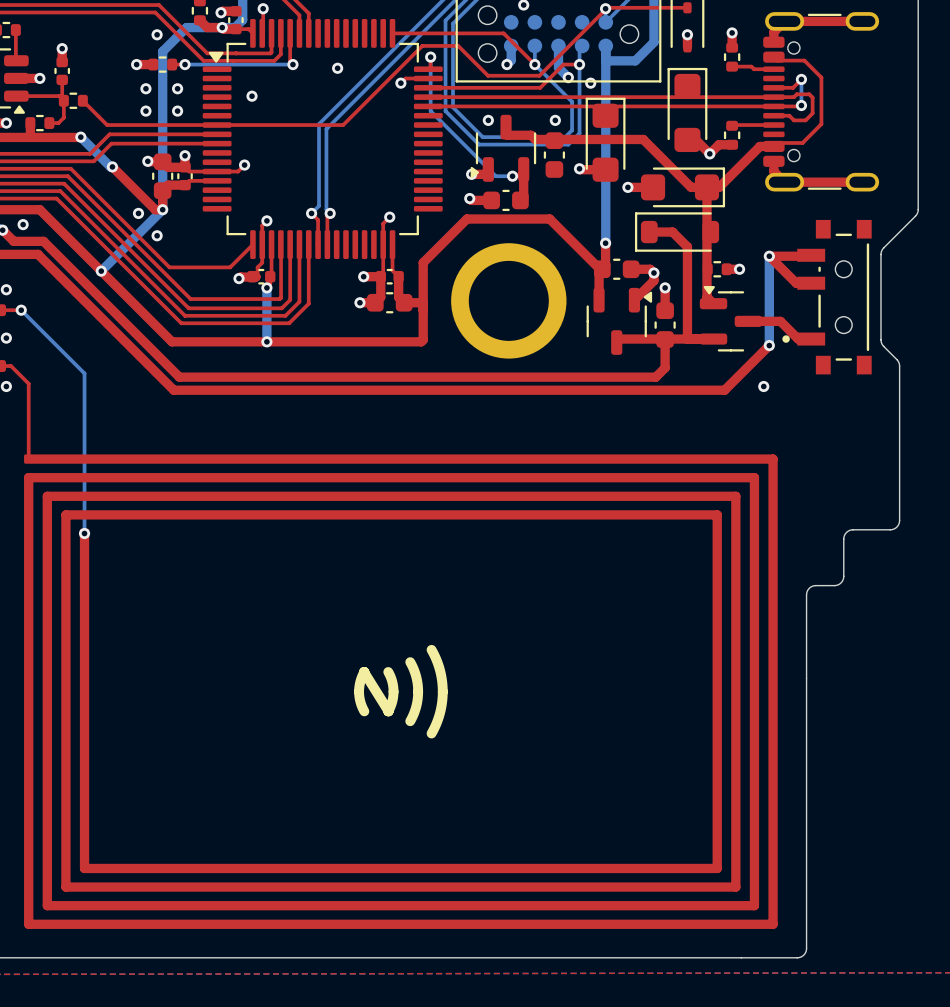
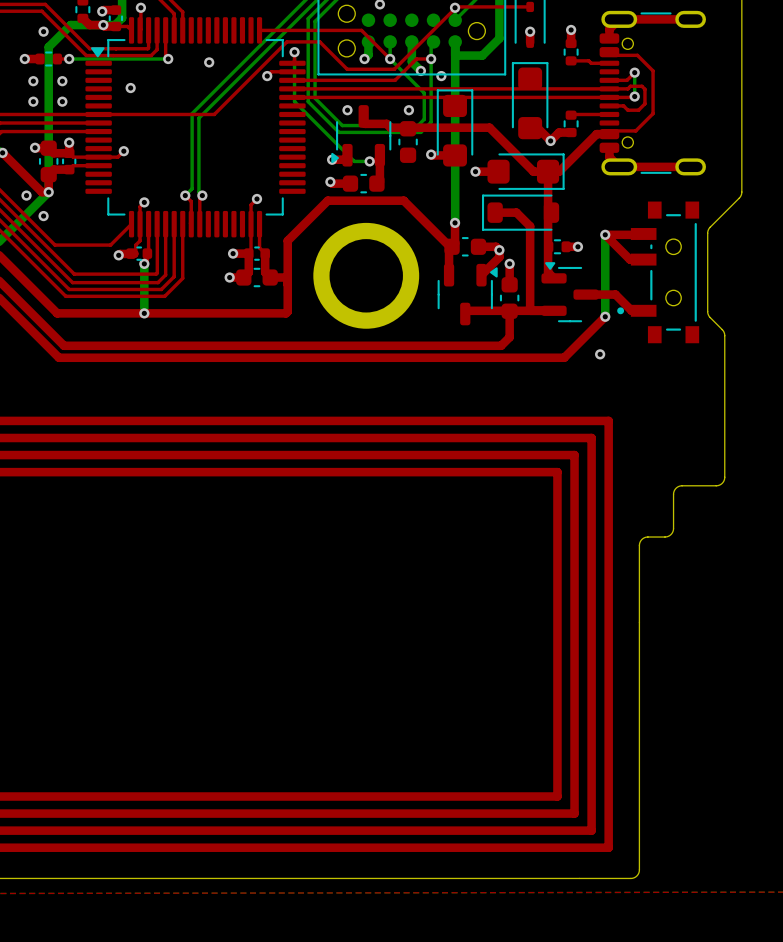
line: (431, 649) (439, 670) (442, 691) (439, 713) (431, 733) -> none
line: (410, 662) (416, 676) (418, 691) (416, 706) (410, 721) -> none
line: (364, 671) (388, 711) -> none
line: (364, 671) (359, 691) (364, 711) -> none
line: (388, 671) (393, 691) (388, 711) -> none

